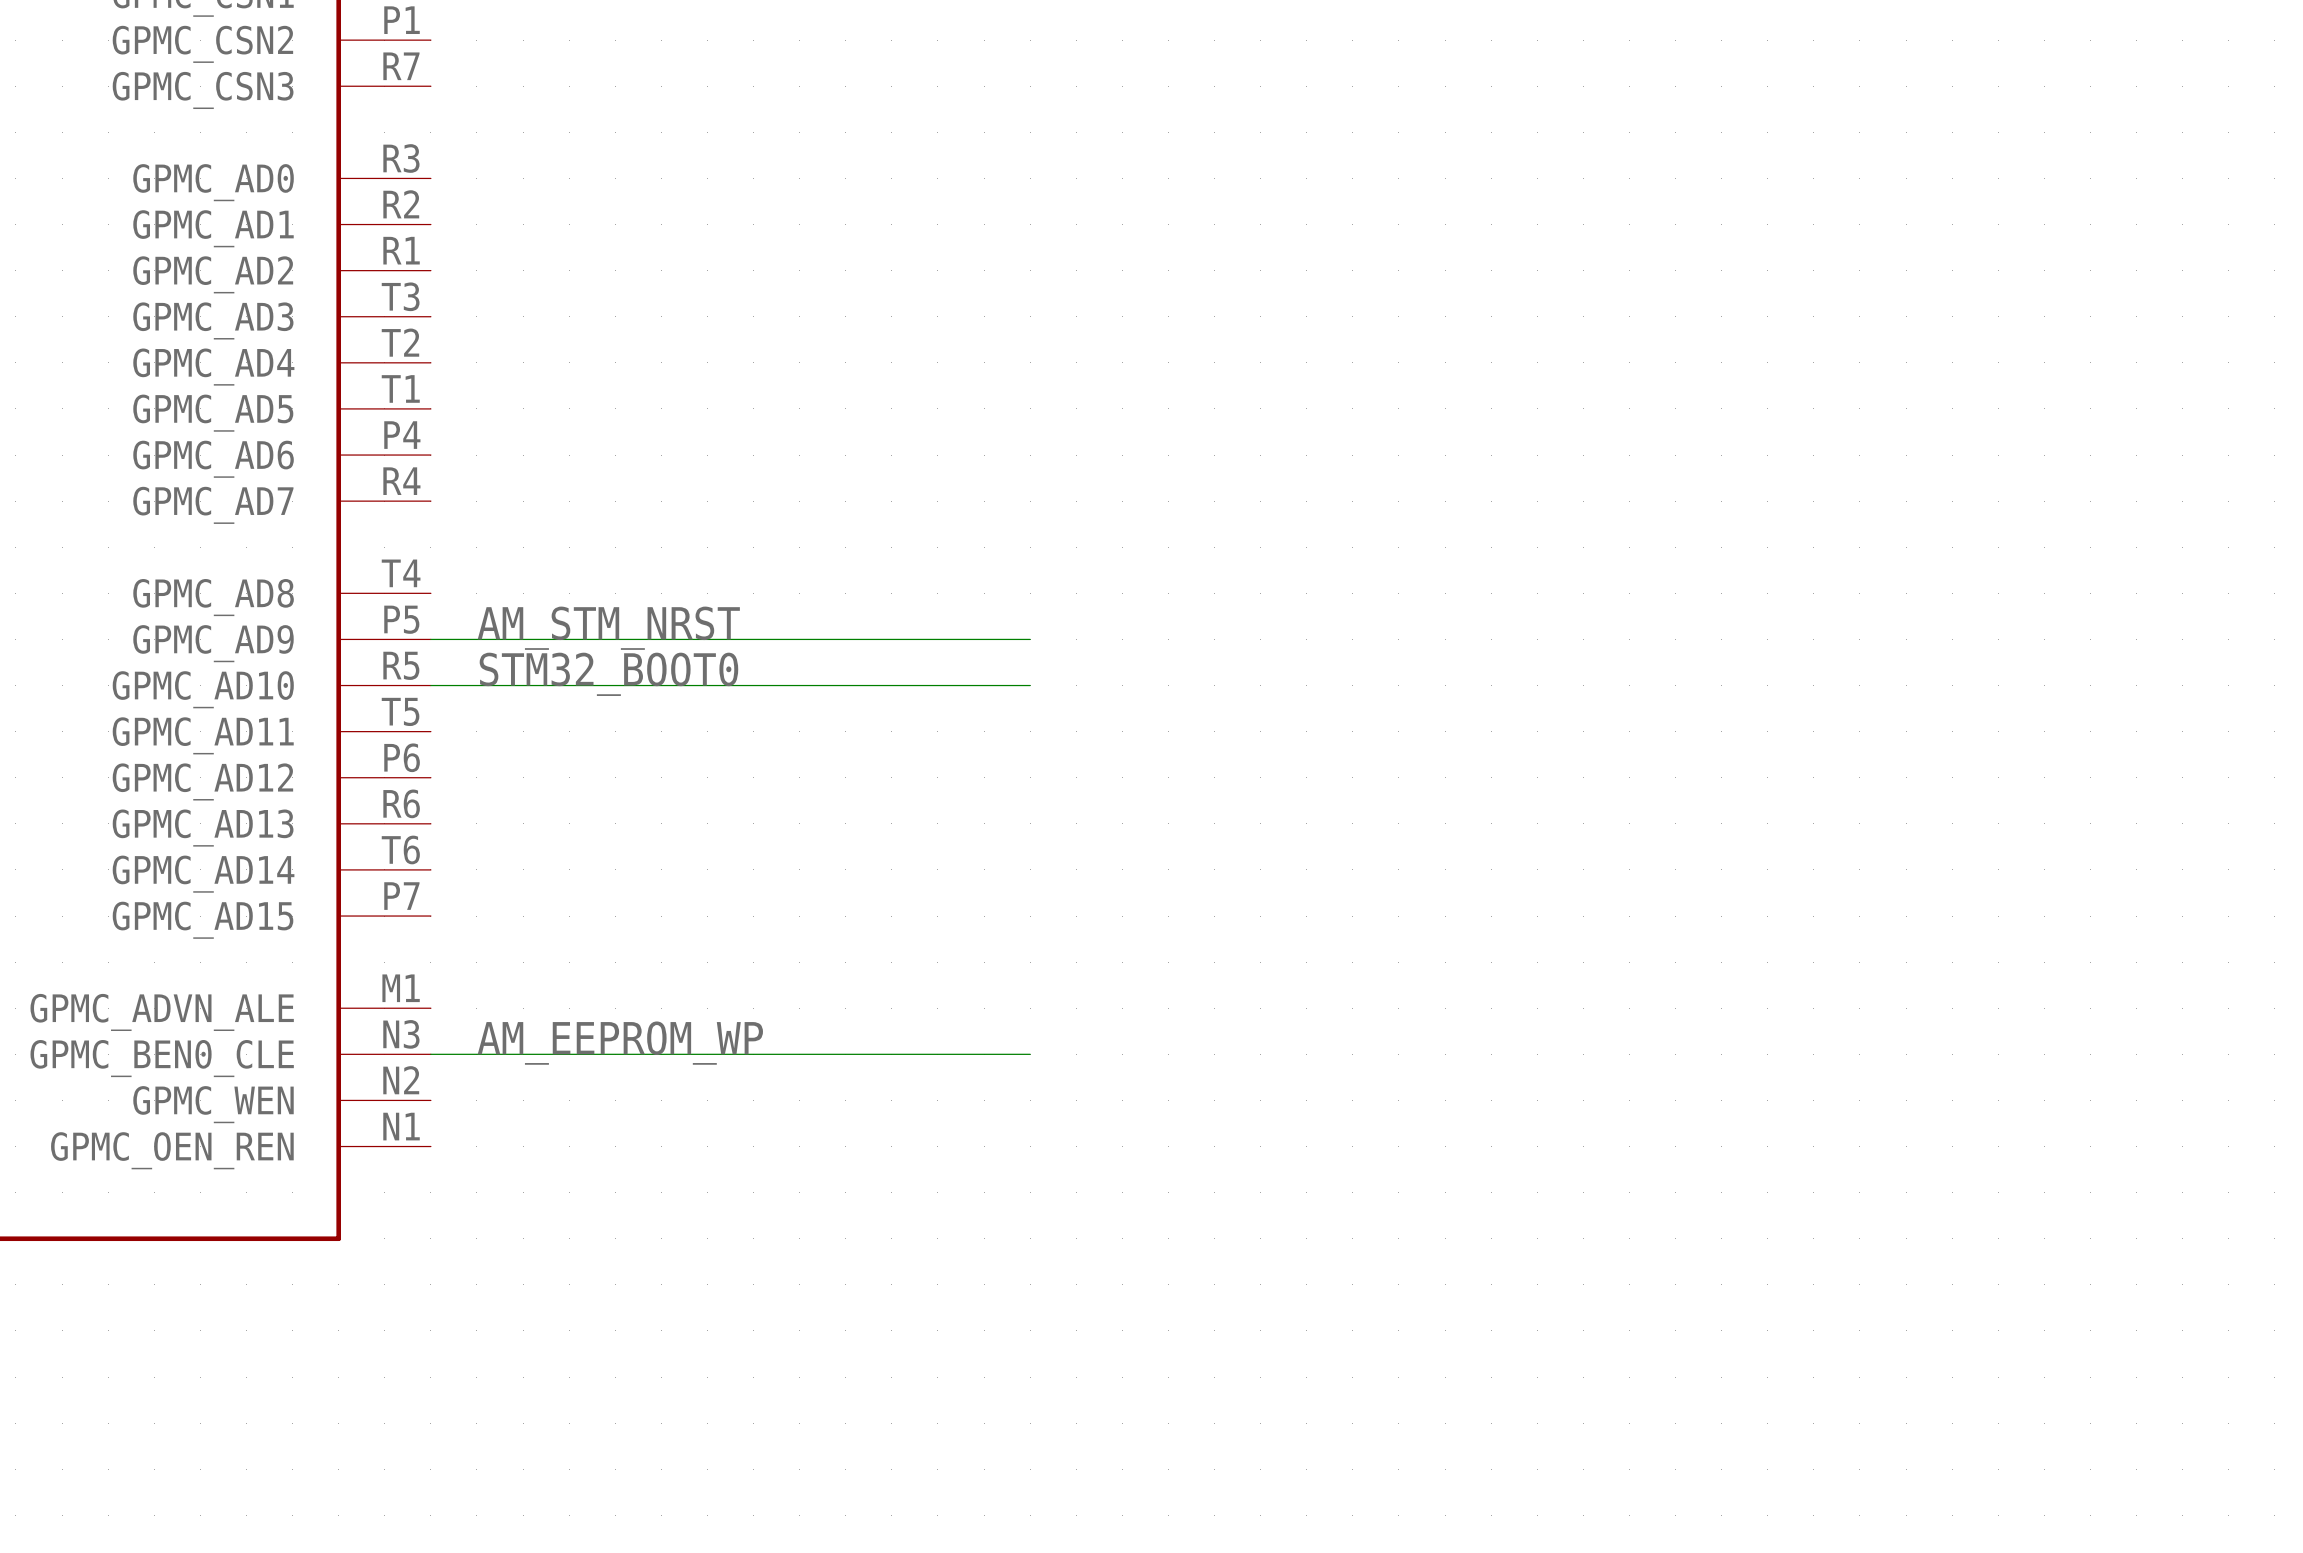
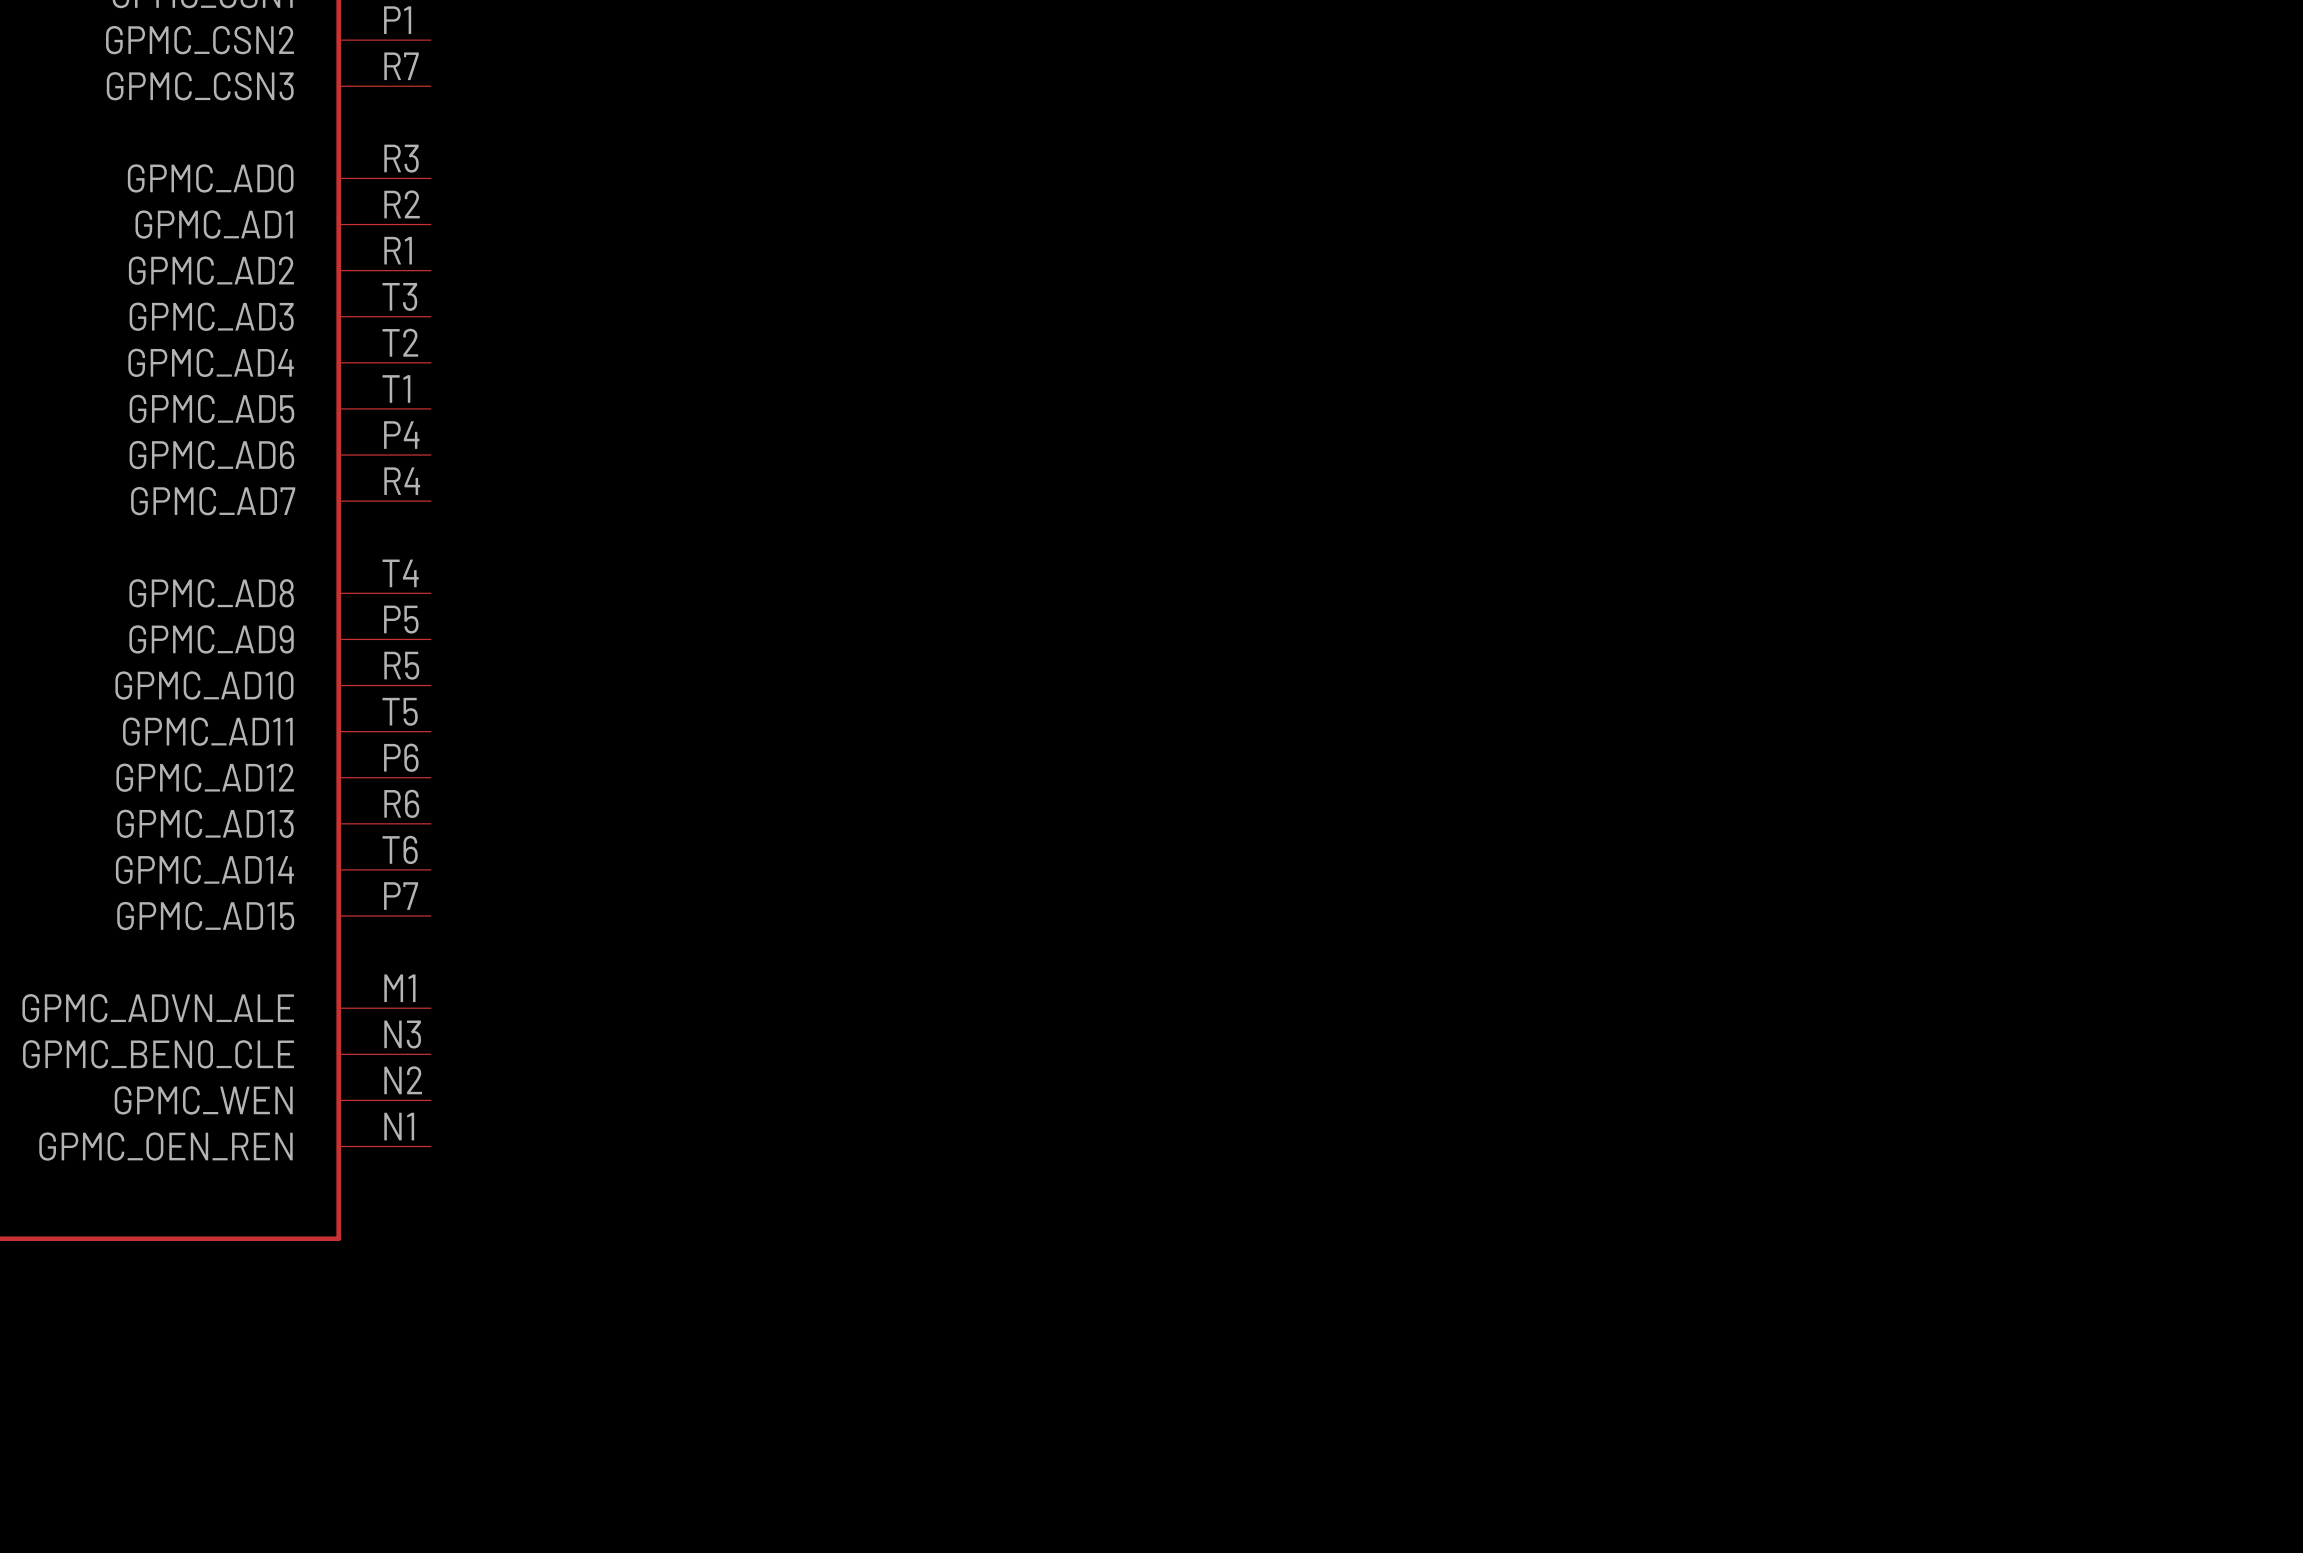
label: AM_STM_NRST (608, 628) -> none
wire: (430, 639) (1030, 639) -> none
label: STM32_BOOT0 (608, 674) -> none
wire: (430, 685) (1030, 685) -> none
label: AM_EEPROM_WP (620, 1043) -> none
wire: (430, 1054) (1030, 1054) -> none

